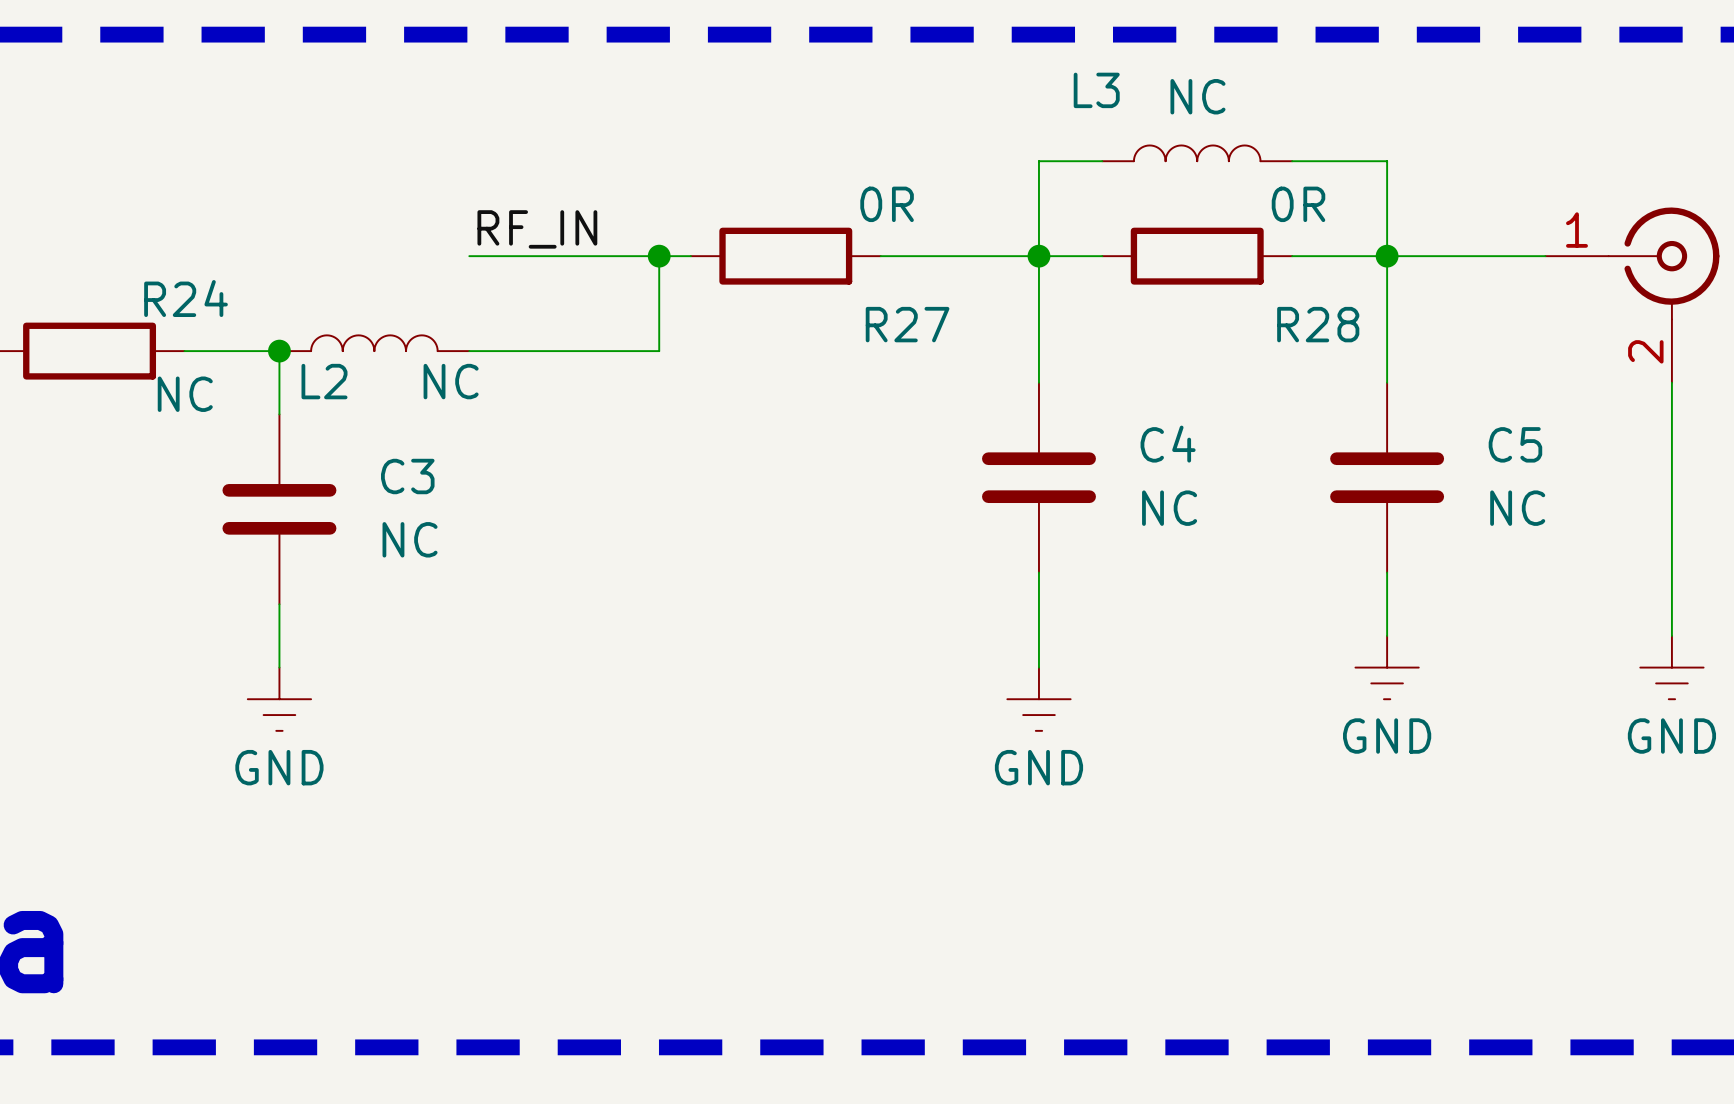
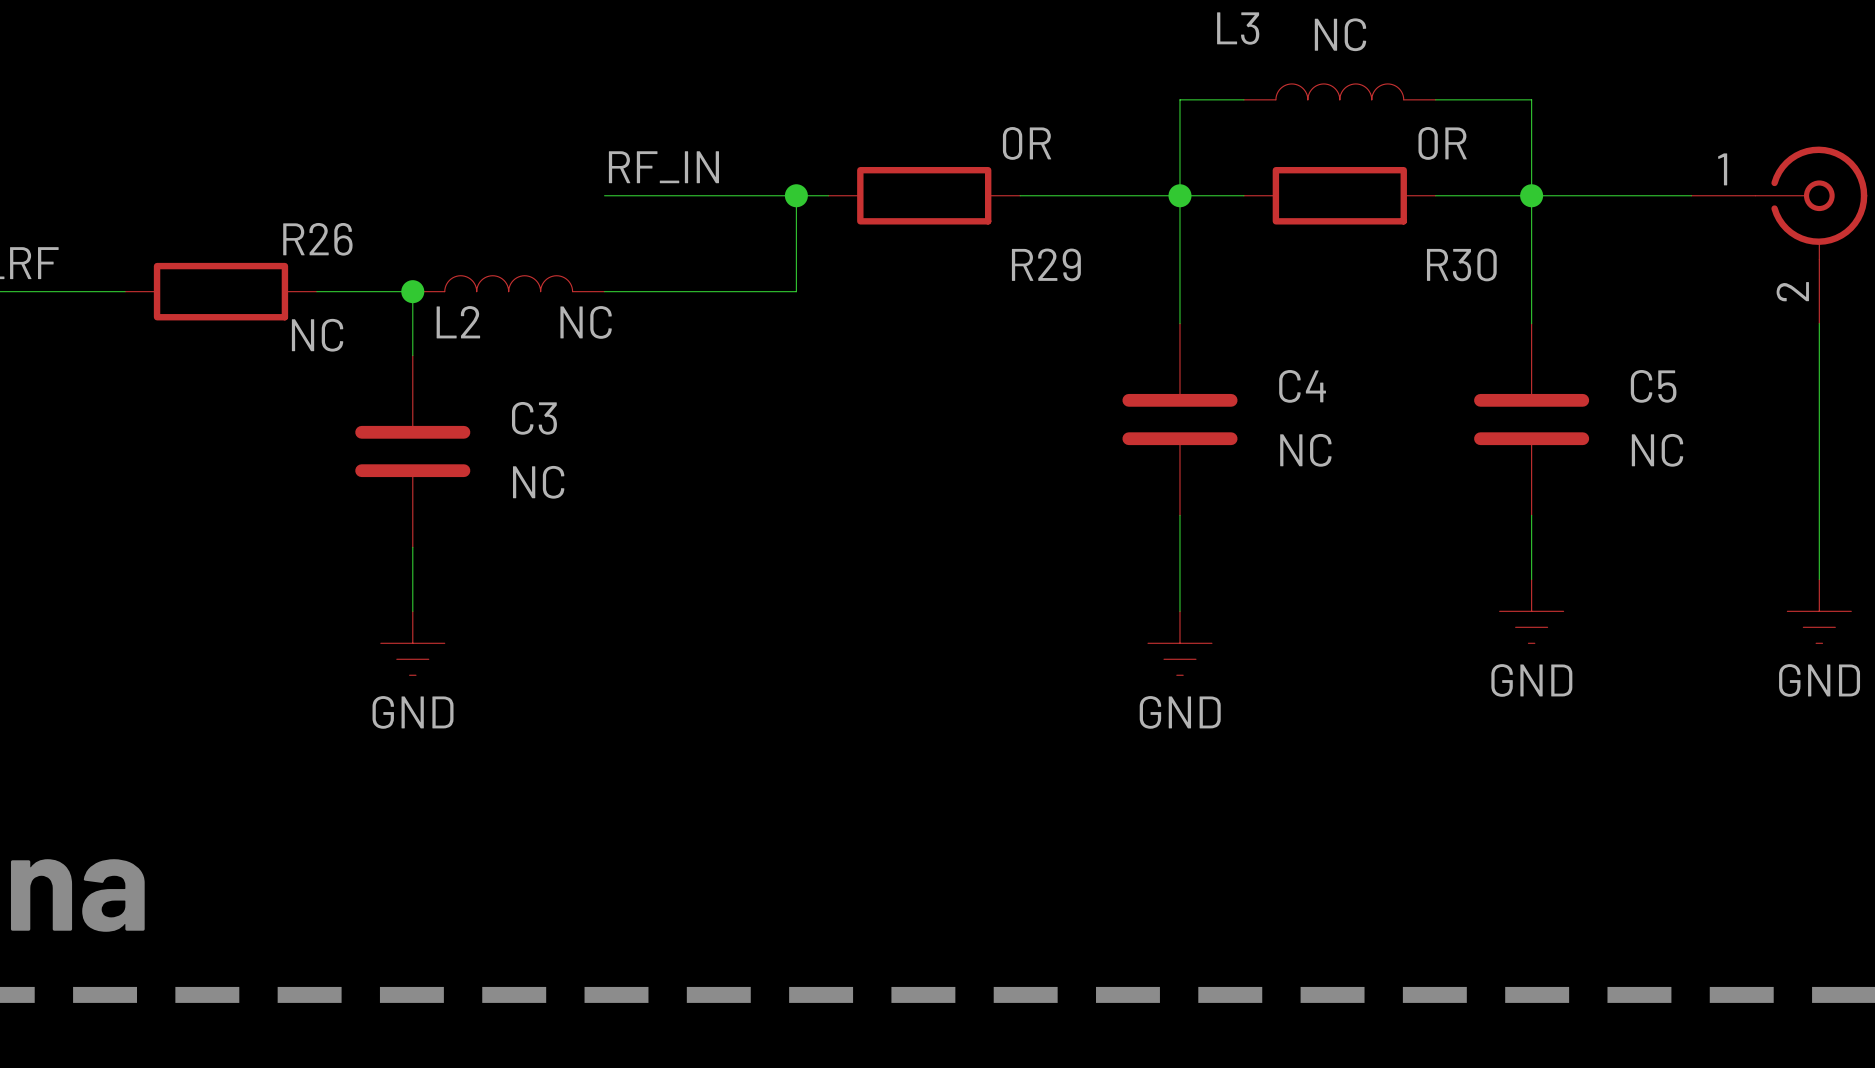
R24 name: R24 (186, 298) -> R26 (317, 239)
R27 name: R27 (907, 324) -> R29 (1046, 264)
R28 name: R28 (1318, 324) -> R30 (1461, 264)

